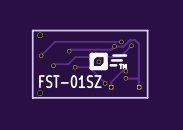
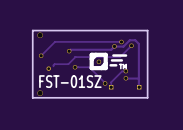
via: (53, 65) -> none
via: none -> (48, 68)

